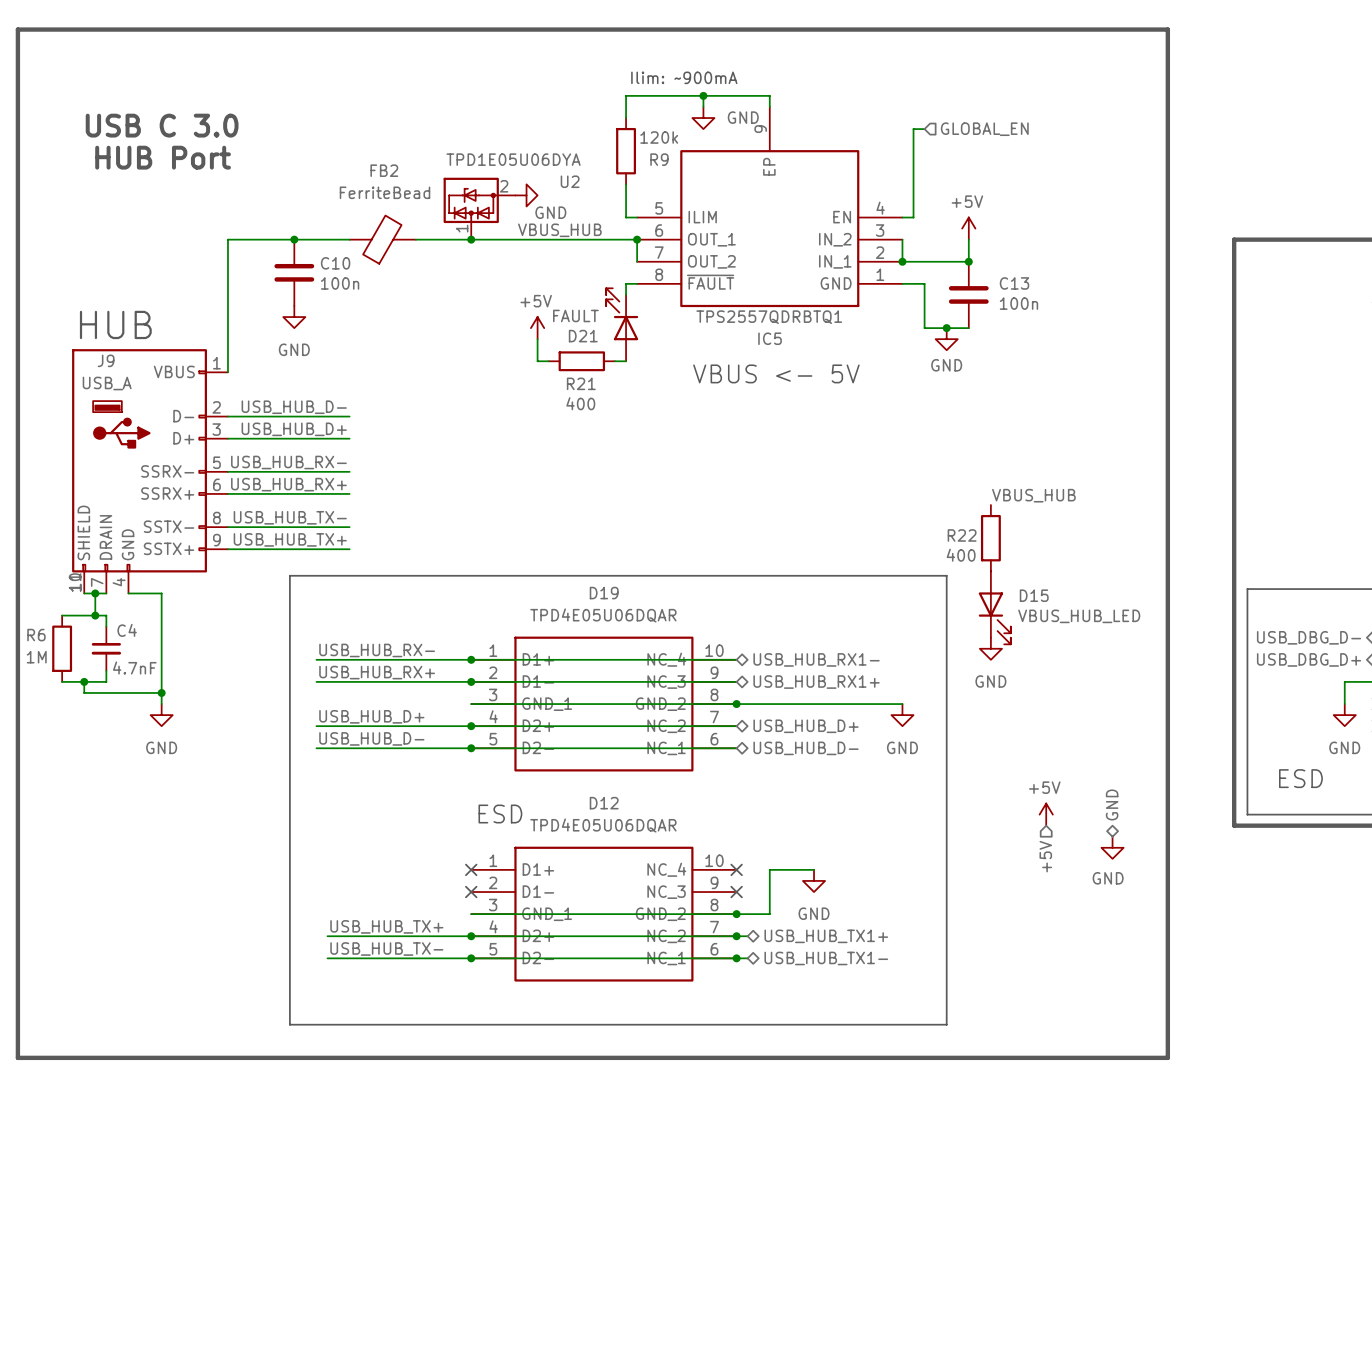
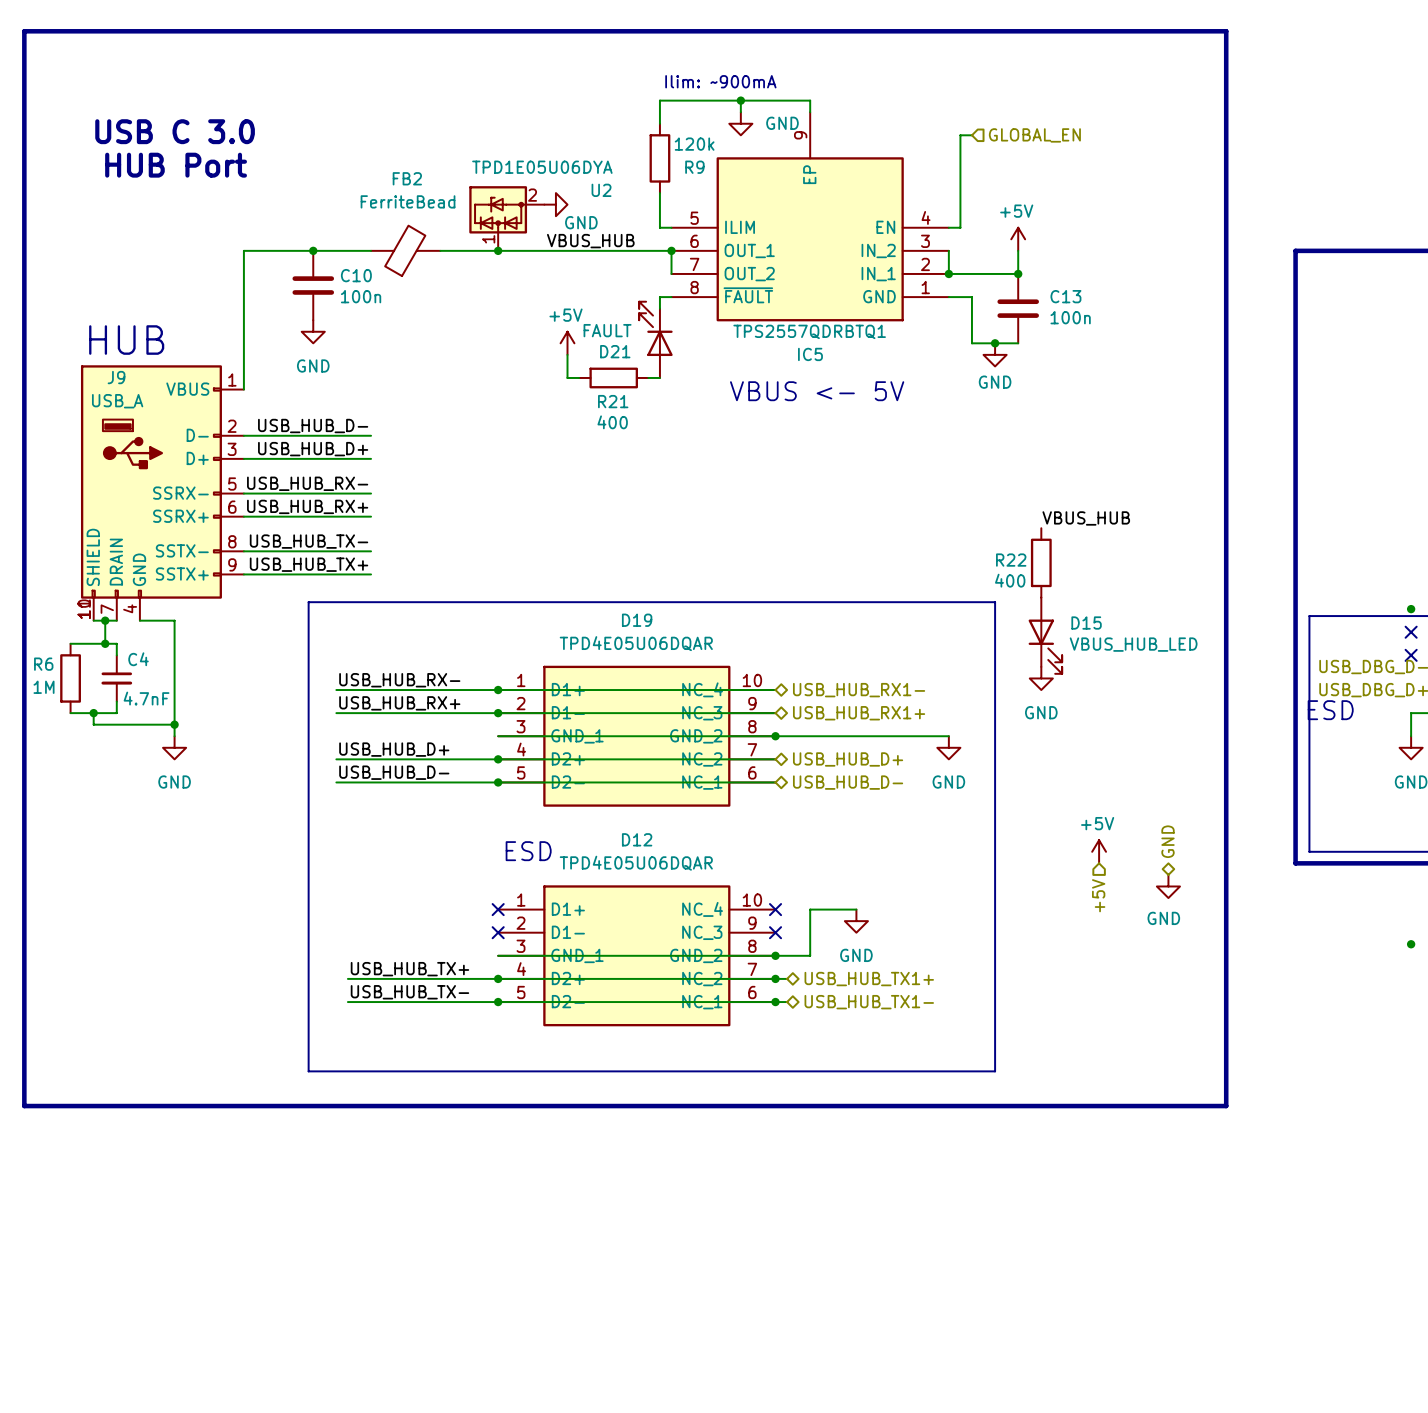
junction: none -> (1411, 609)
no-connect mark: none -> (1411, 632)
no-connect mark: none -> (1411, 655)
text position: ESD (1300, 778) -> ESD (1330, 710)
junction: none -> (1411, 944)

